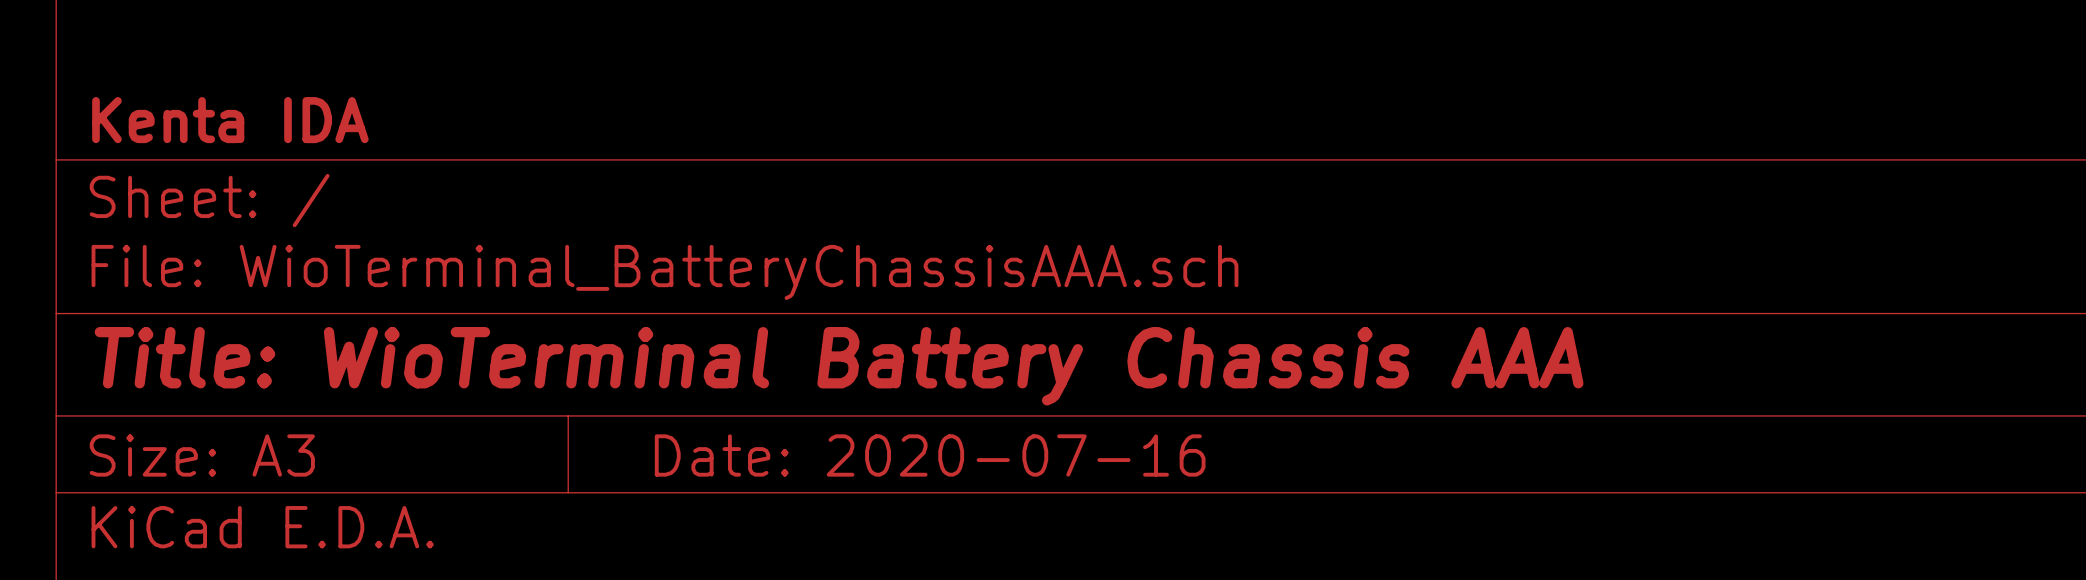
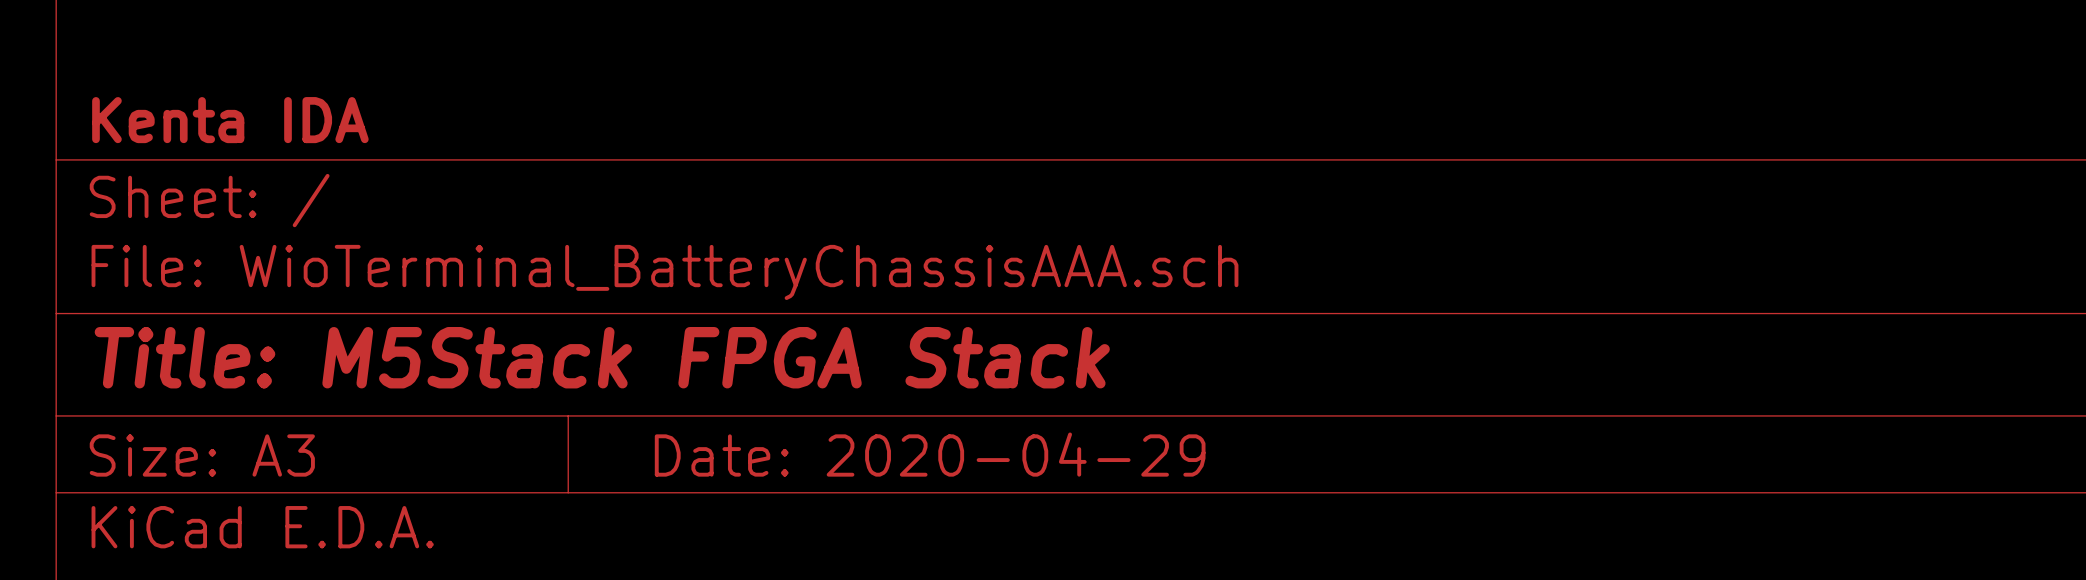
title block: Title: WioTerminal Battery Chassis AAA (839, 366) -> Title: M5Stack FPGA Stack (602, 357)
title block: Date: 2020-07-16 (930, 455) -> Date: 2020-04-29 (930, 454)

